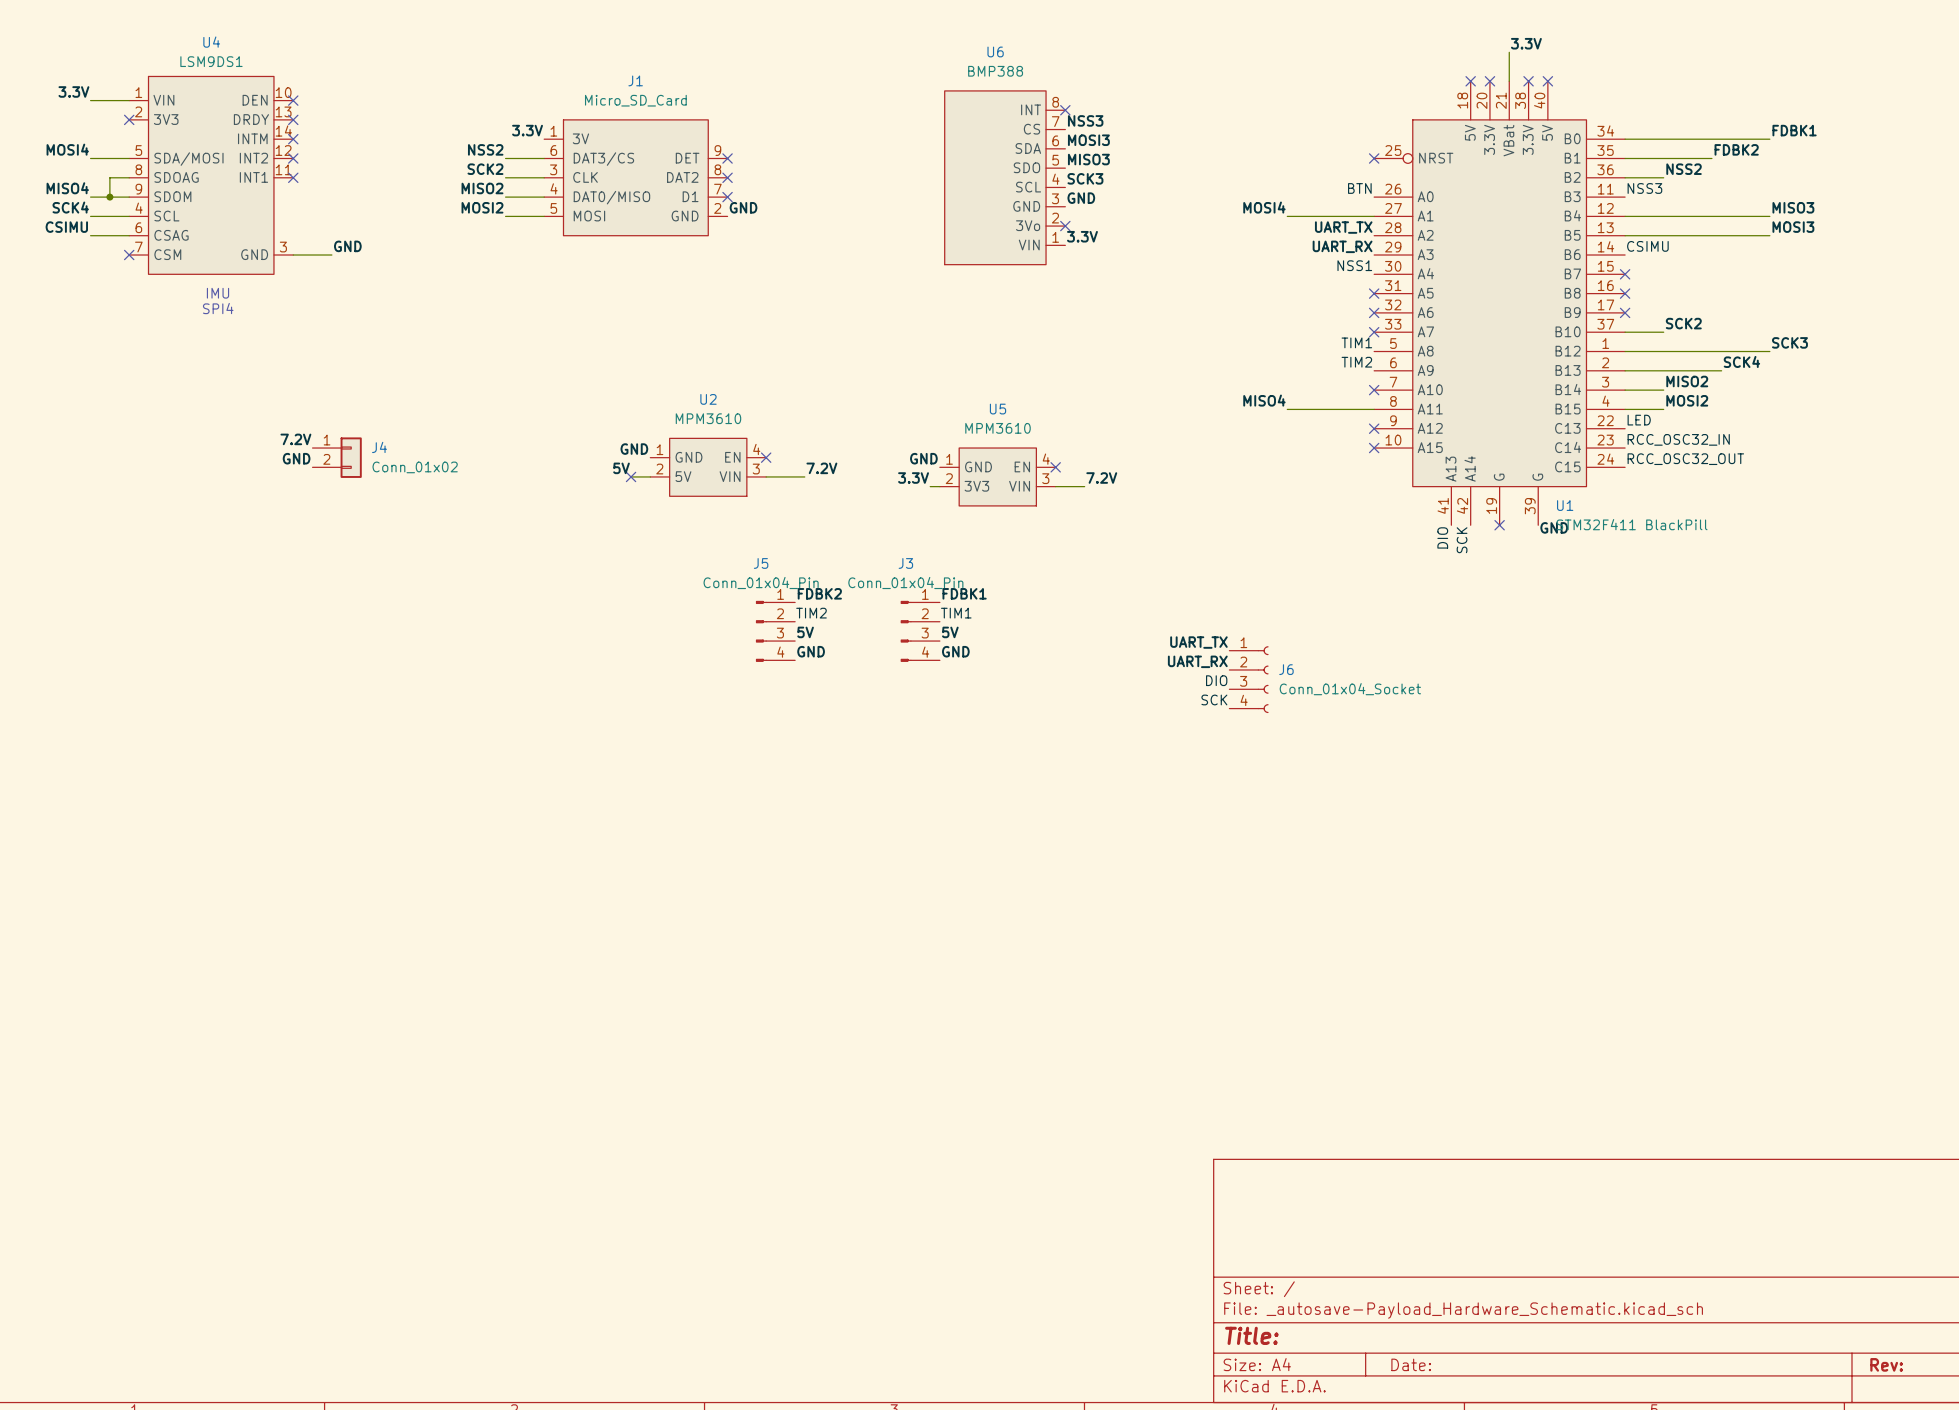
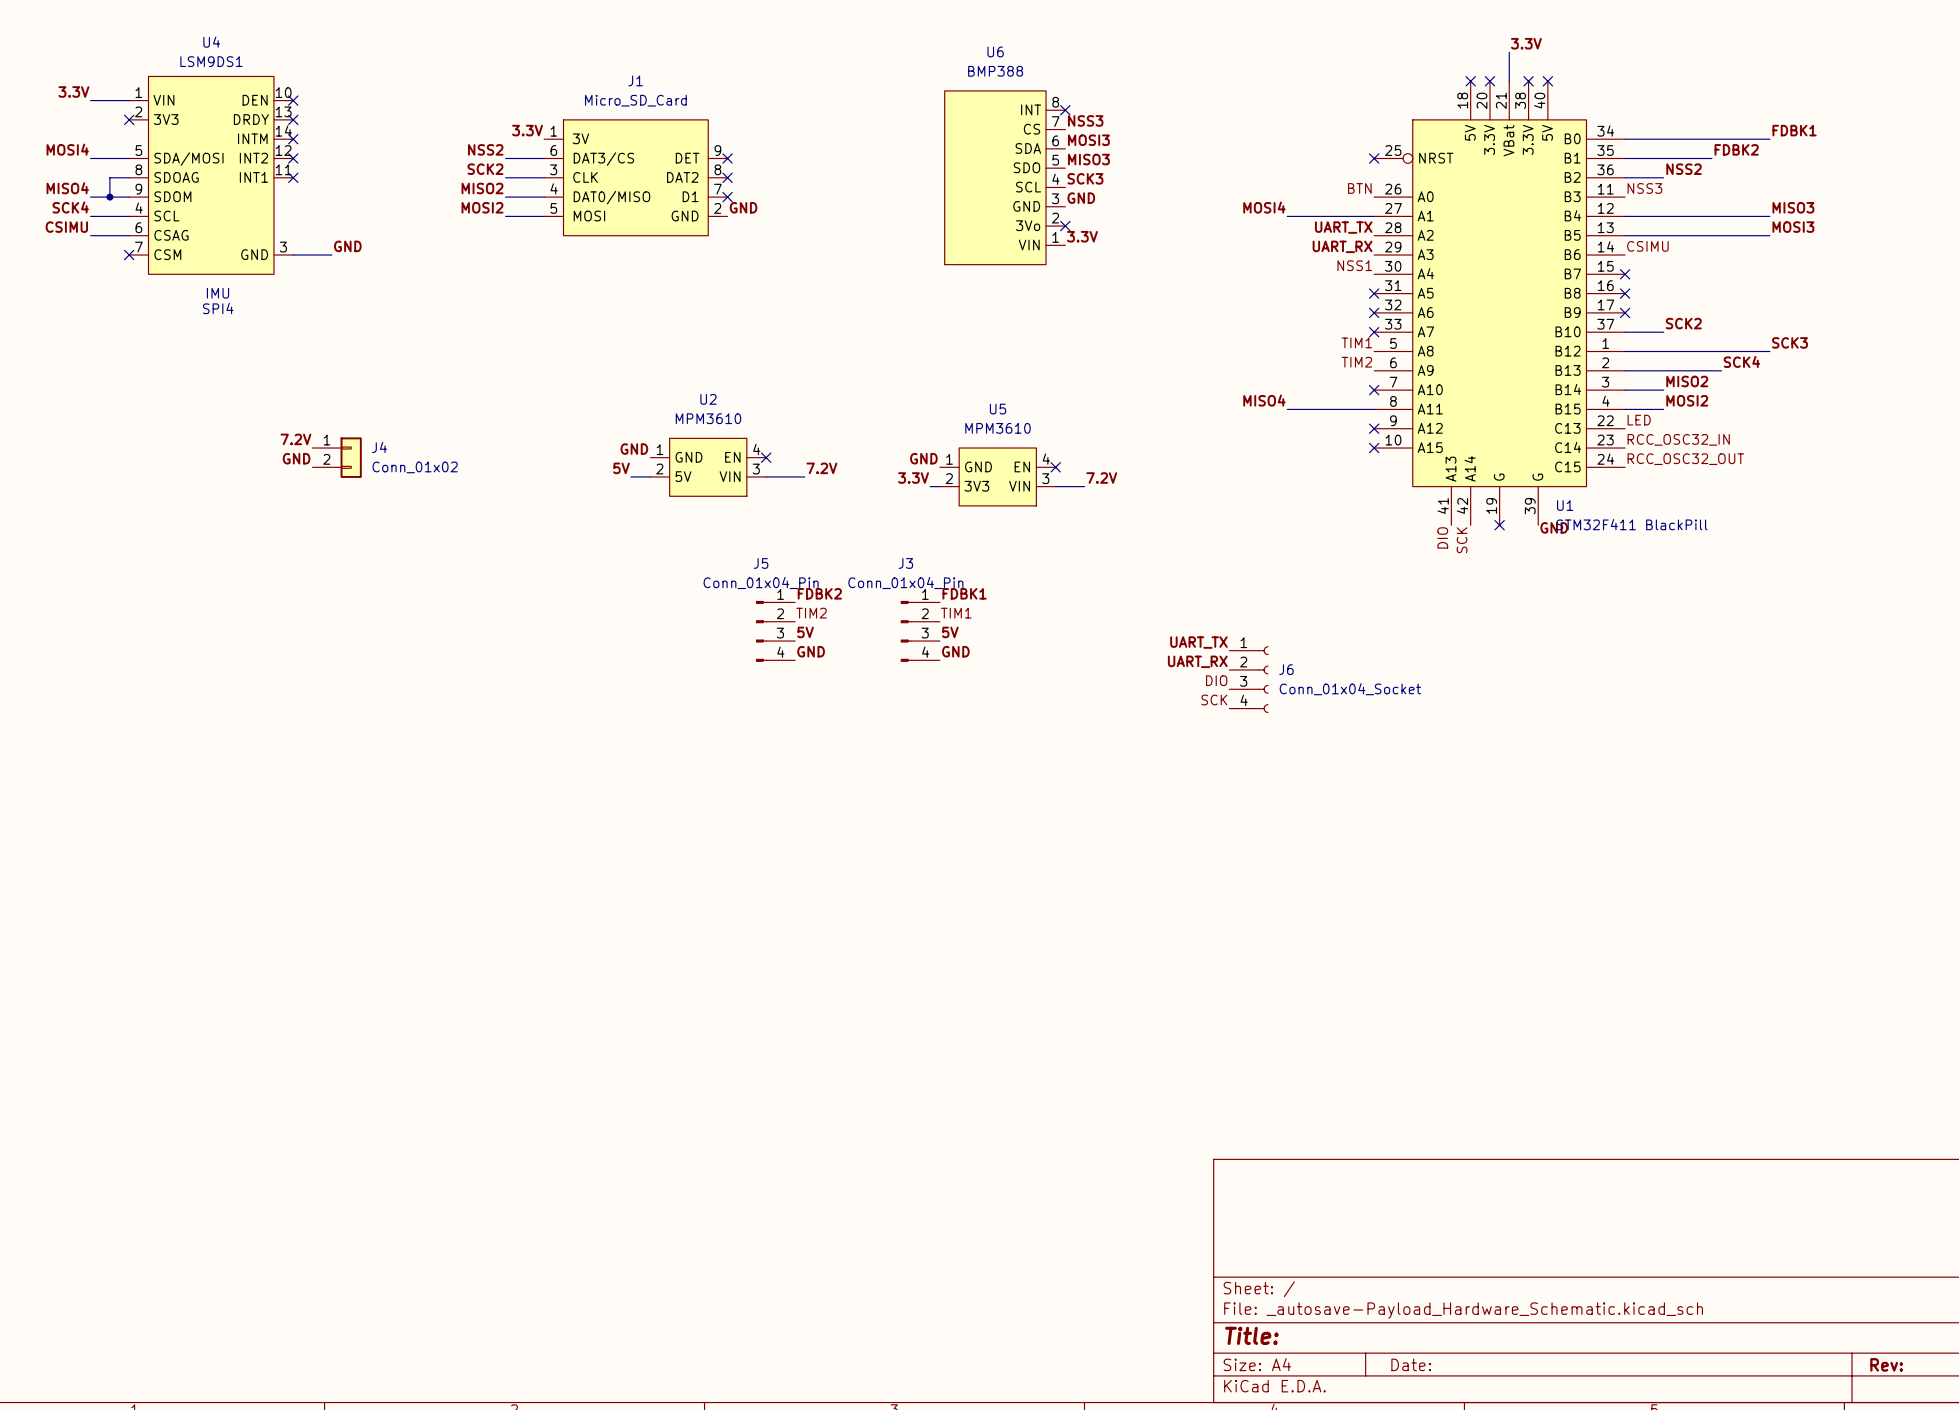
no-connect mark: (631, 476) -> none

